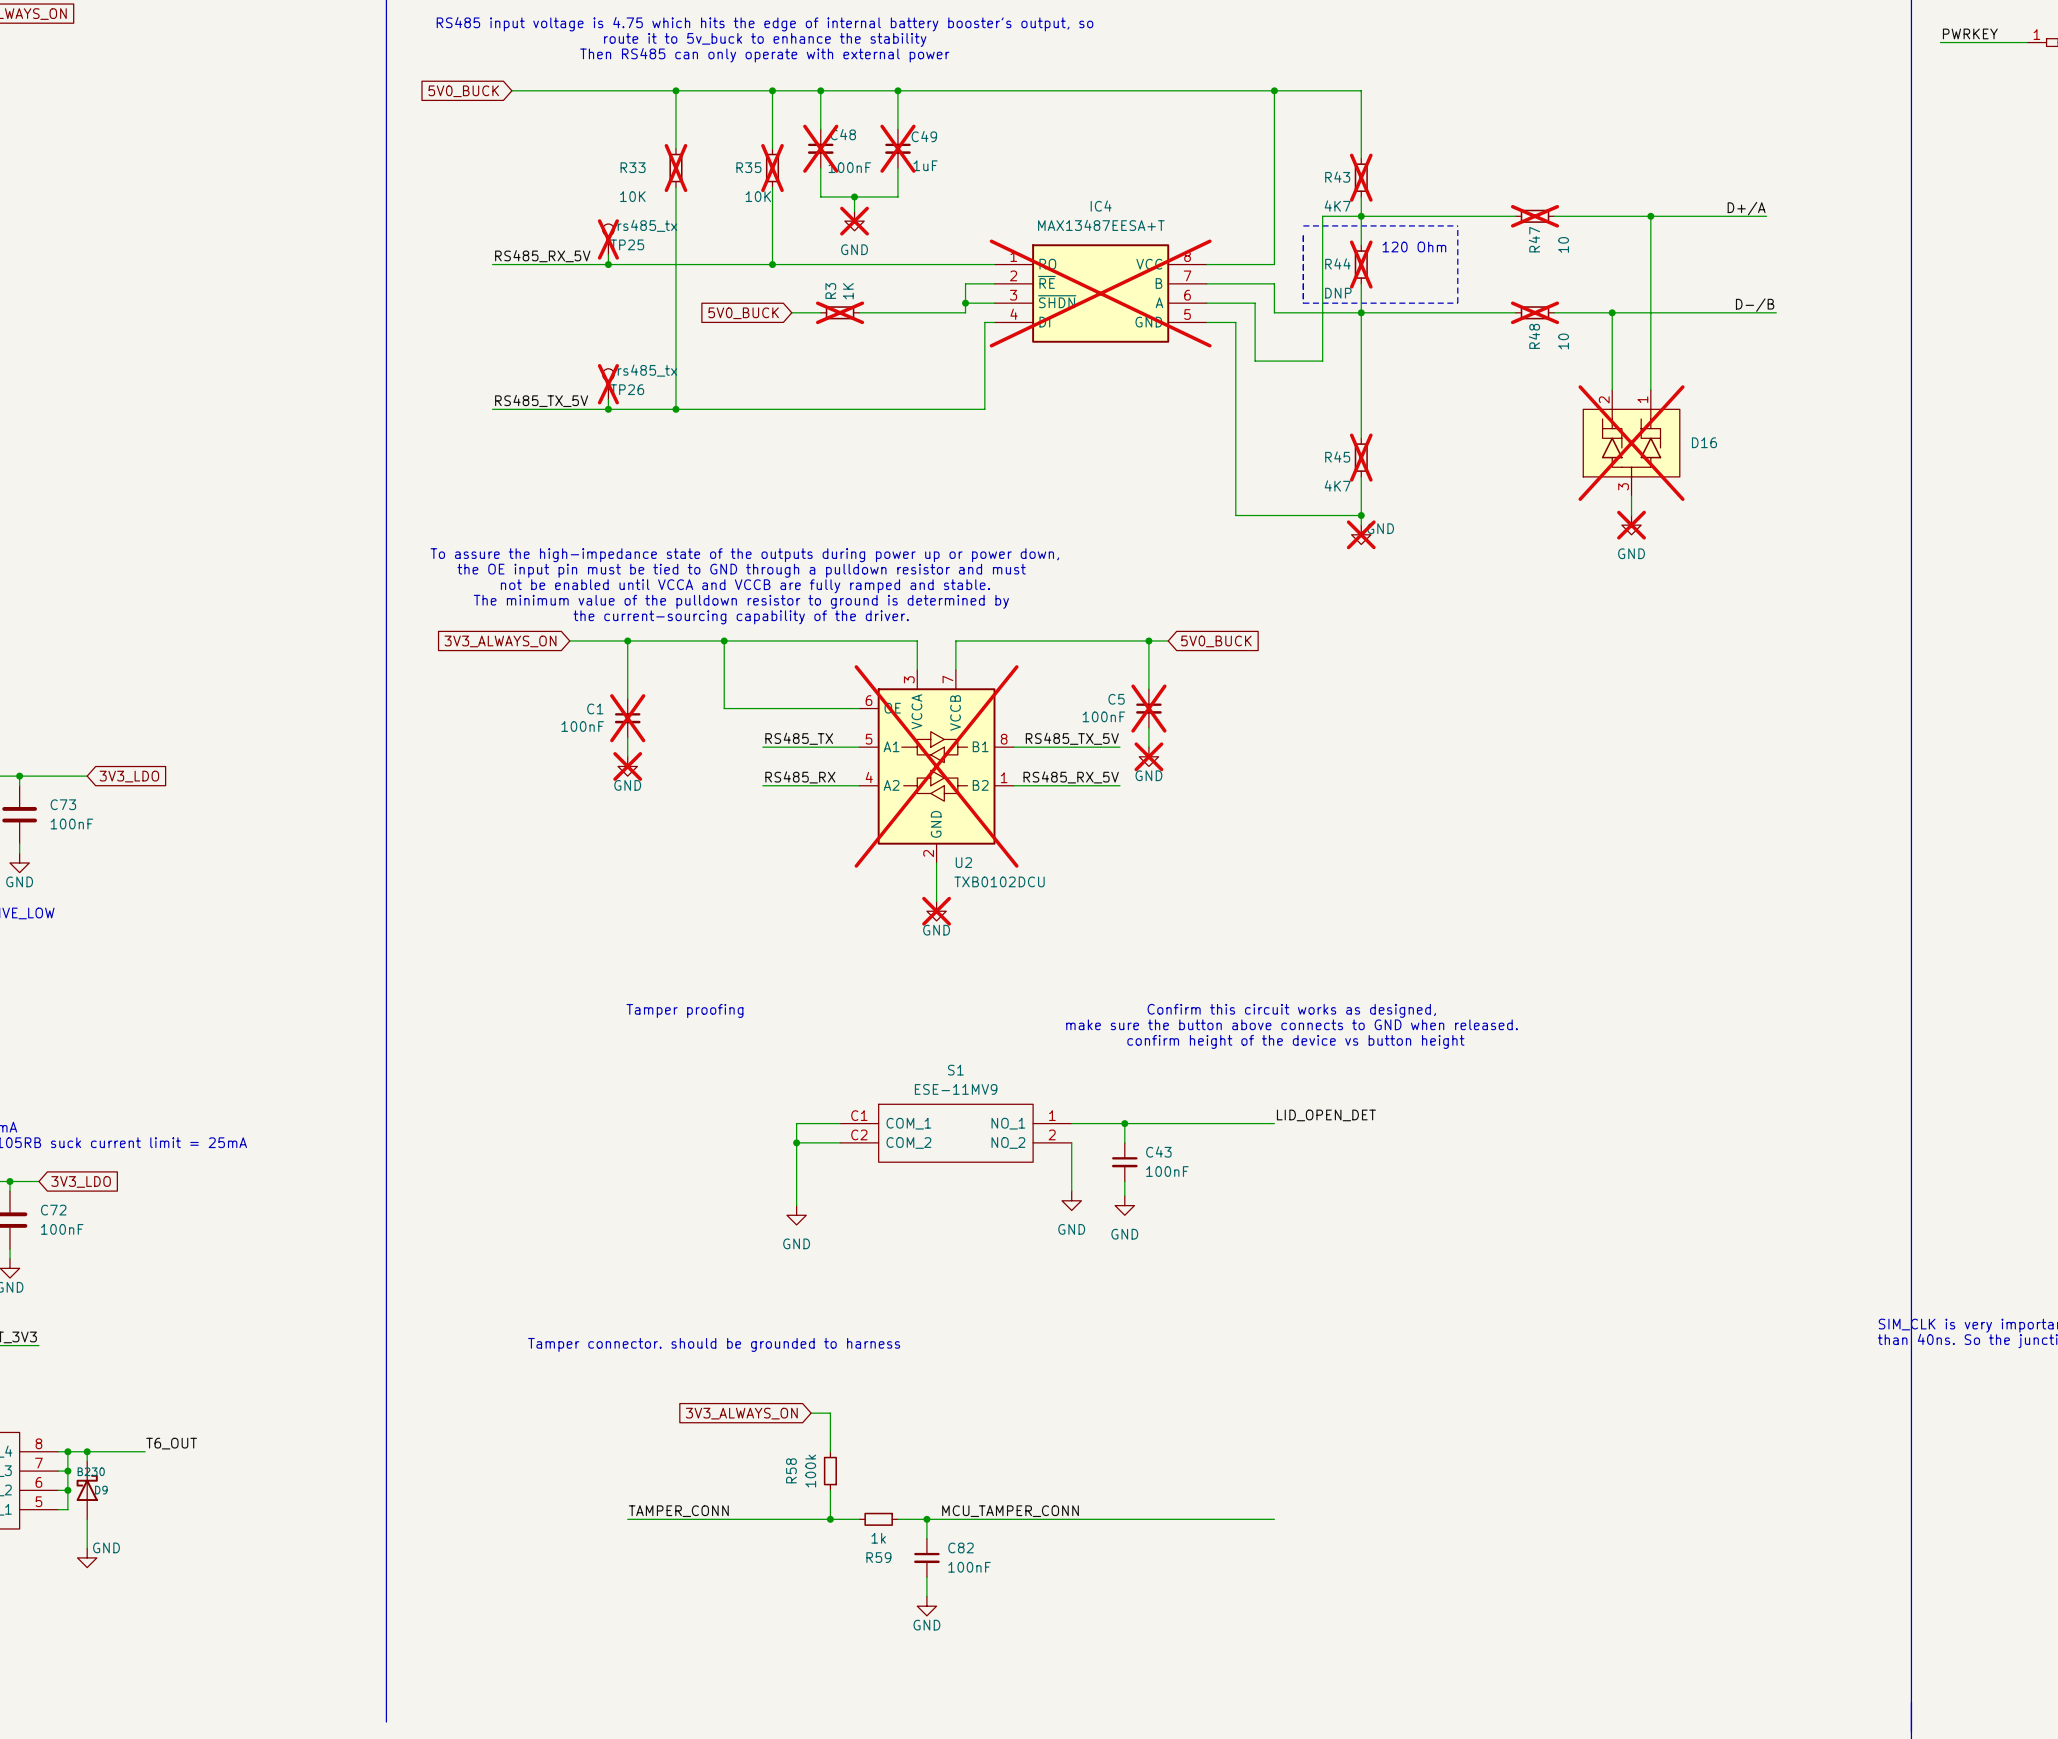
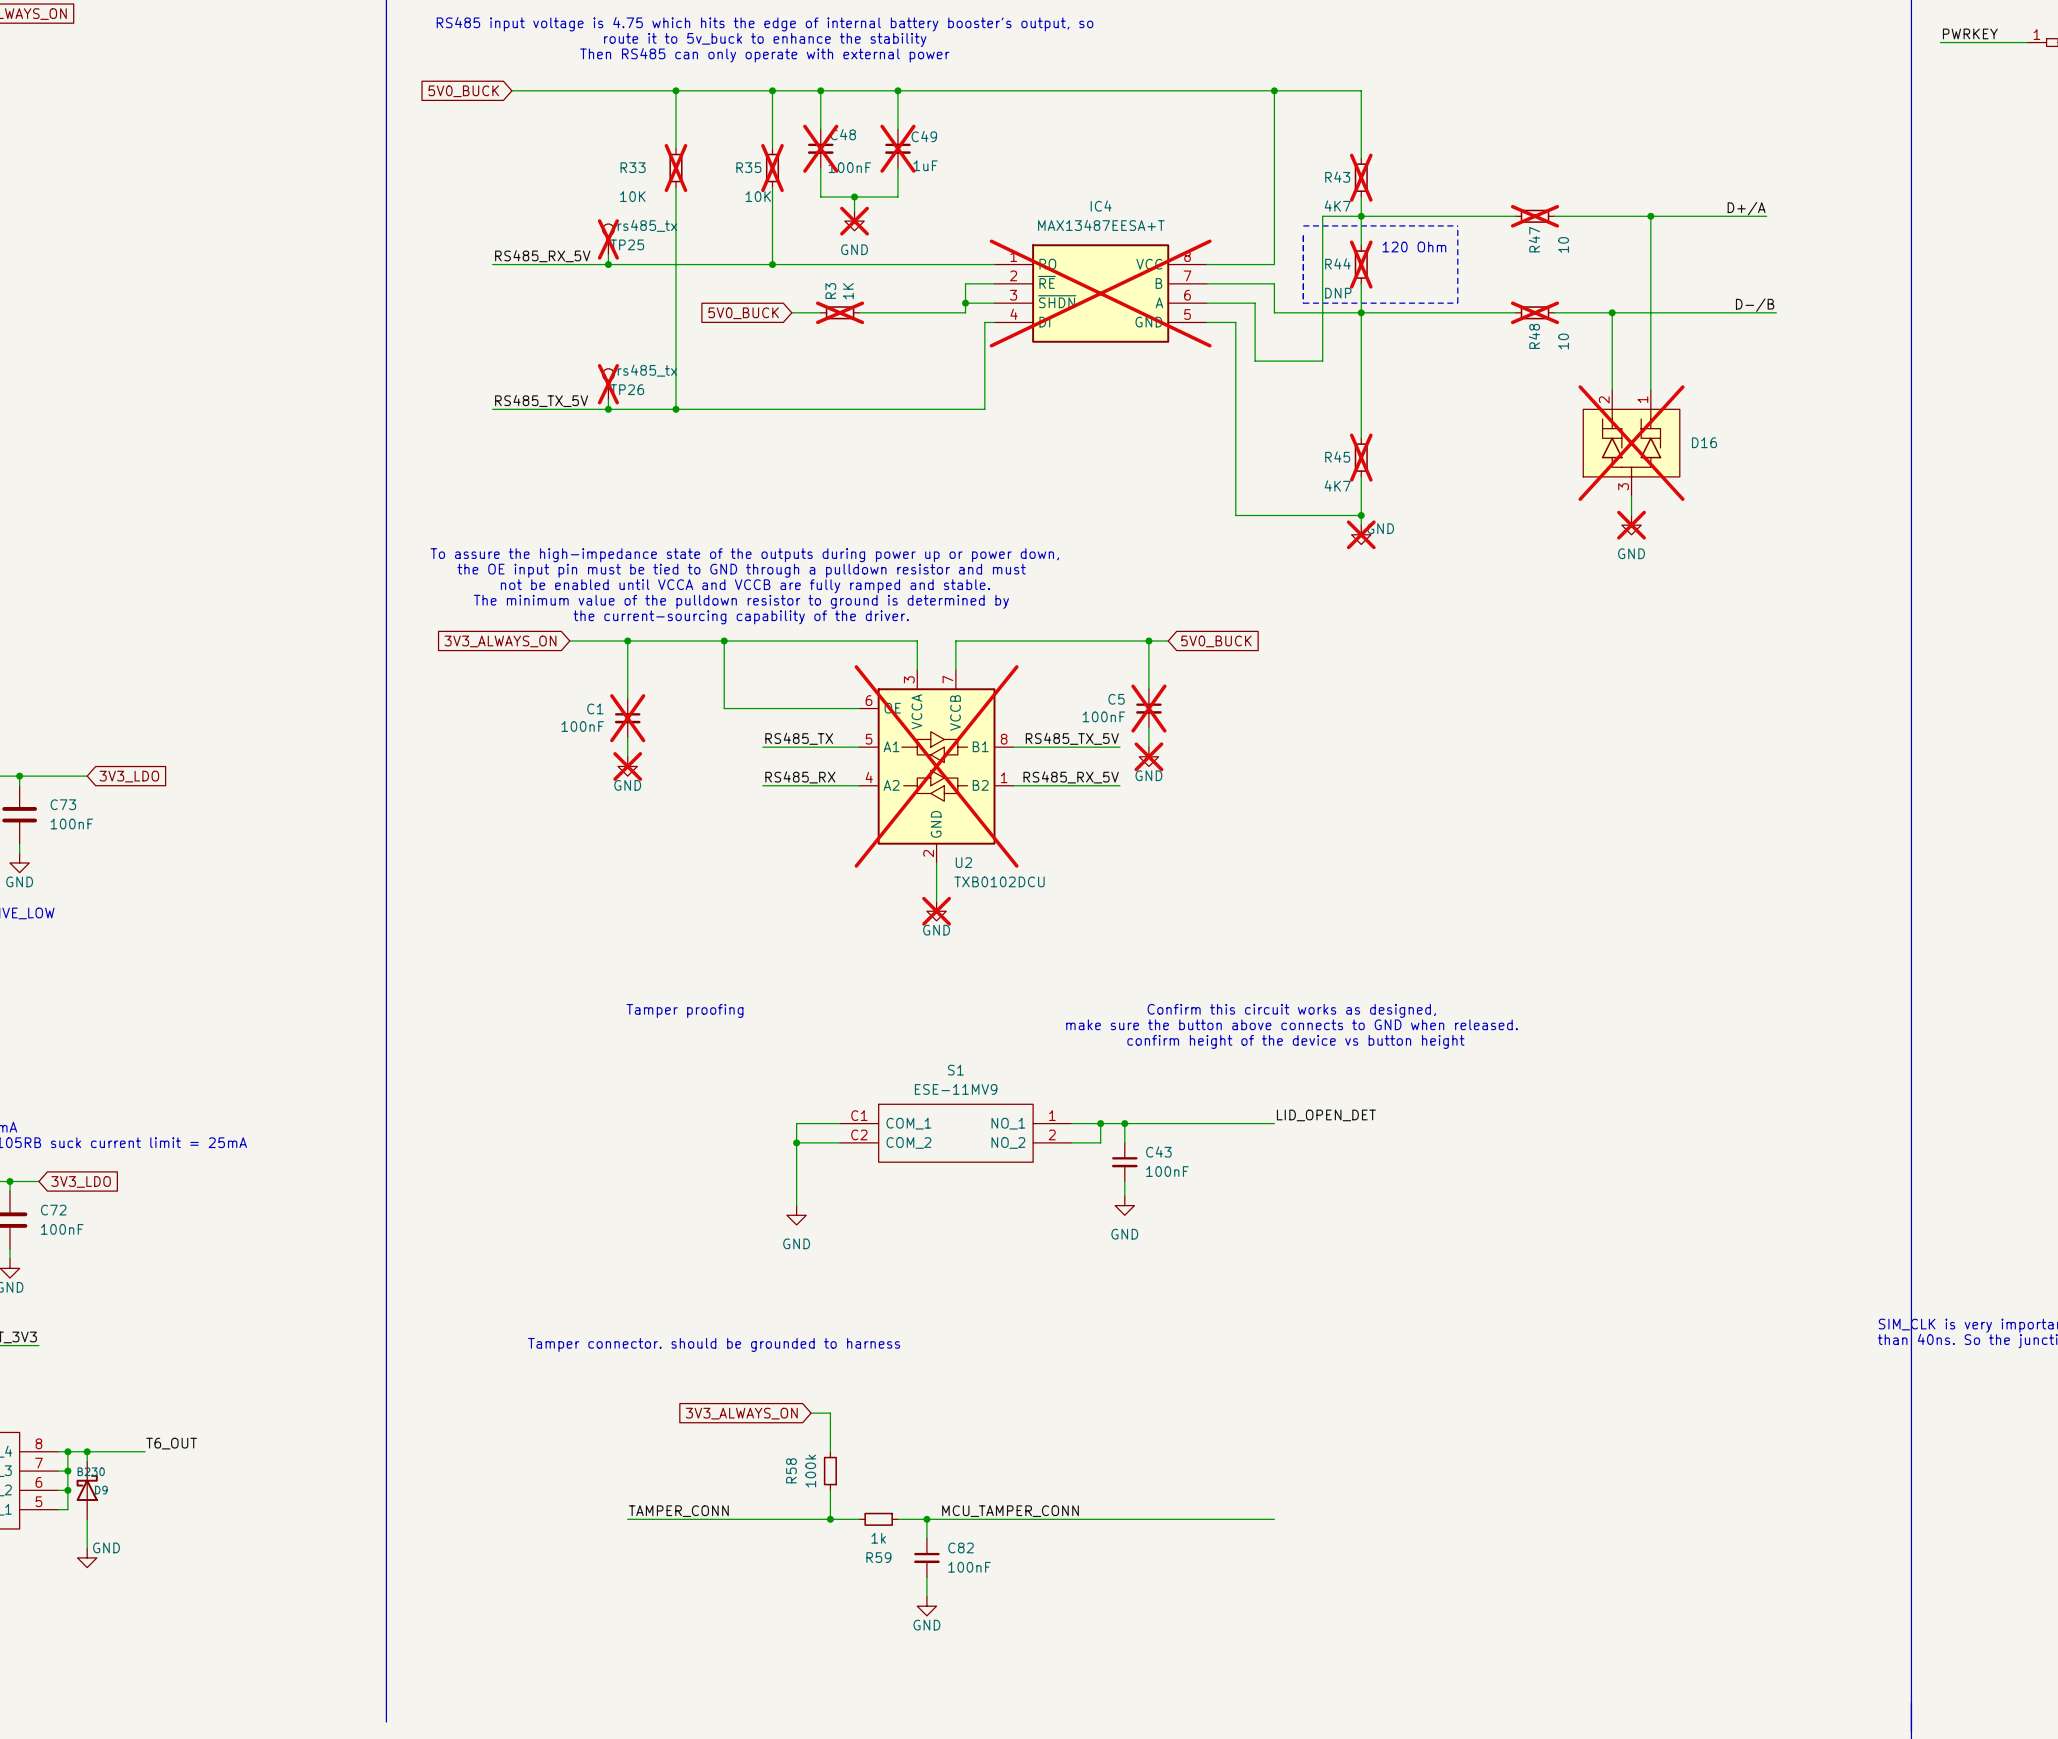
junction: none -> (1100, 1123)
wire: (1071, 1142) (1071, 1191) -> (1071, 1142) (1100, 1142) (1100, 1123)
power symbol: GND (1071, 1200) -> none

